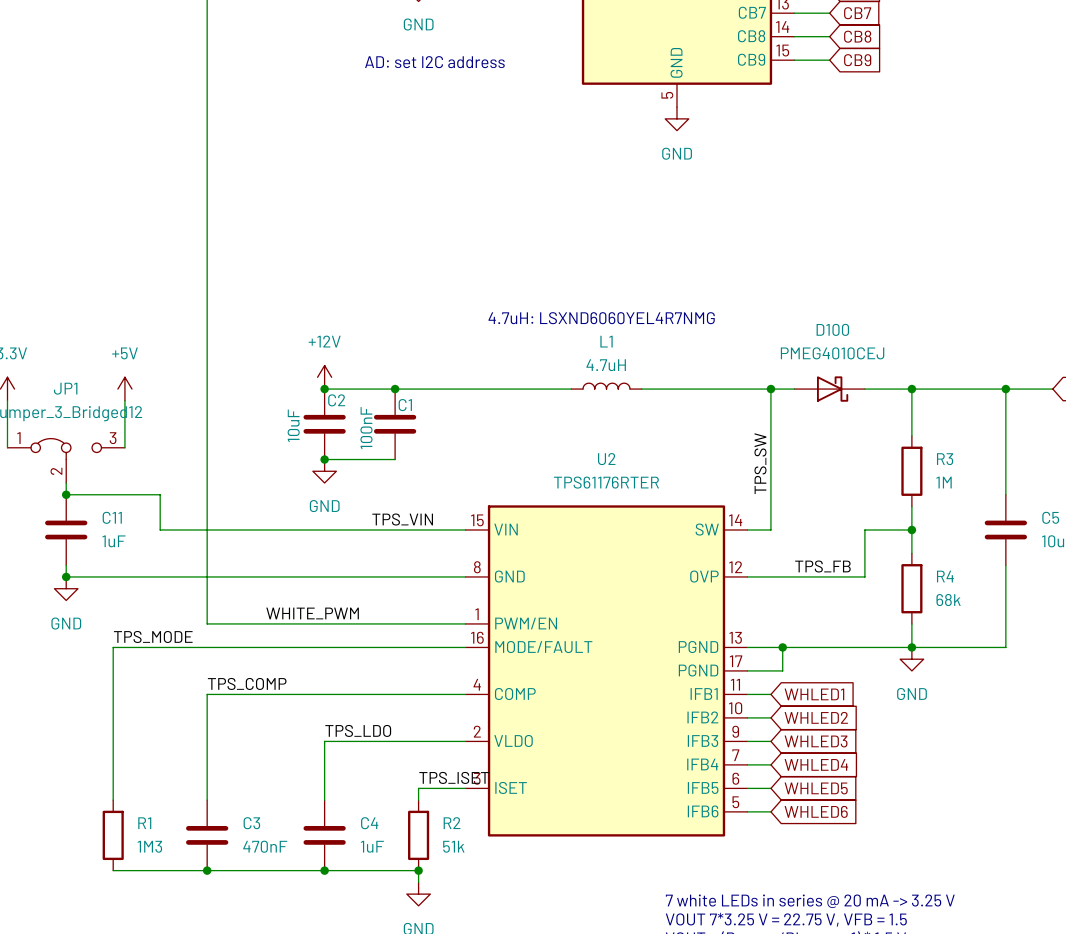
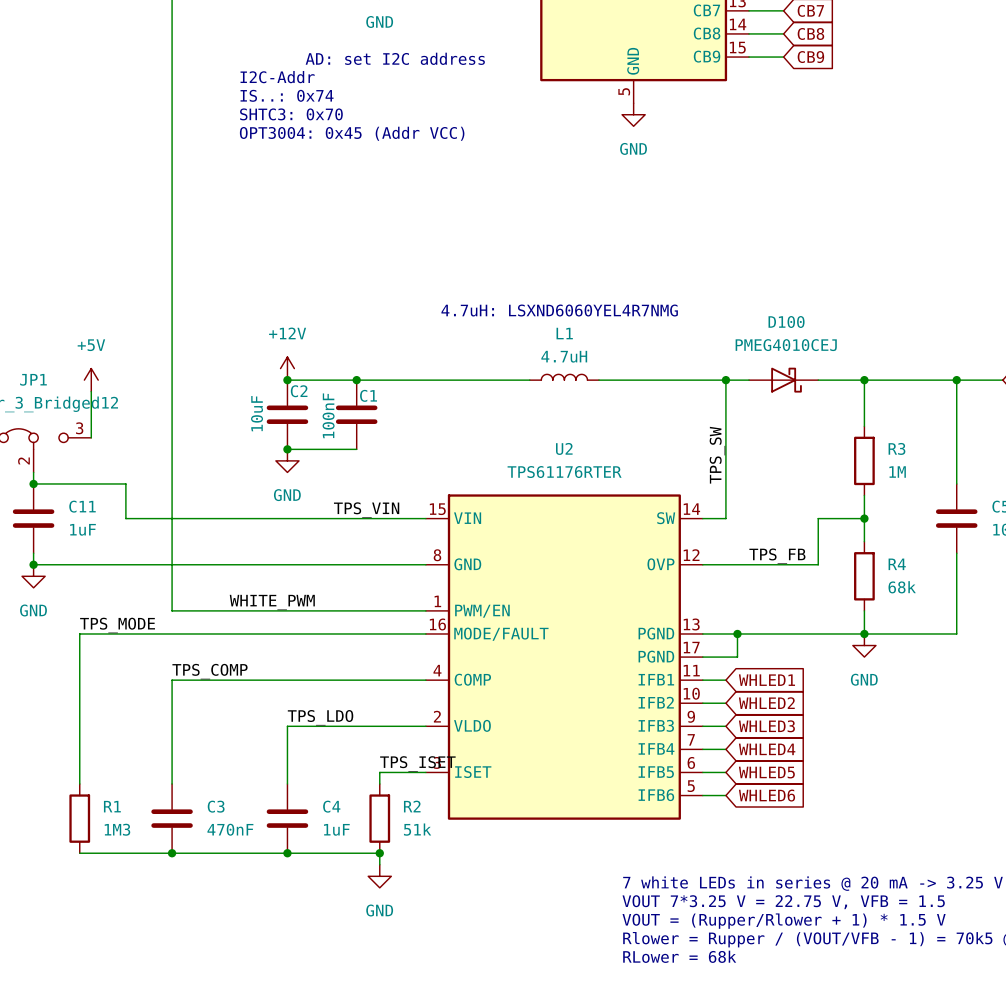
text: none -> I2C-Addr (277, 77)
text: none -> IS..: 0x74 (287, 95)
text: none -> SHTC3: 0x70 (291, 114)
text: none -> OPT3004: 0x45 (Addr VCC) (352, 133)

